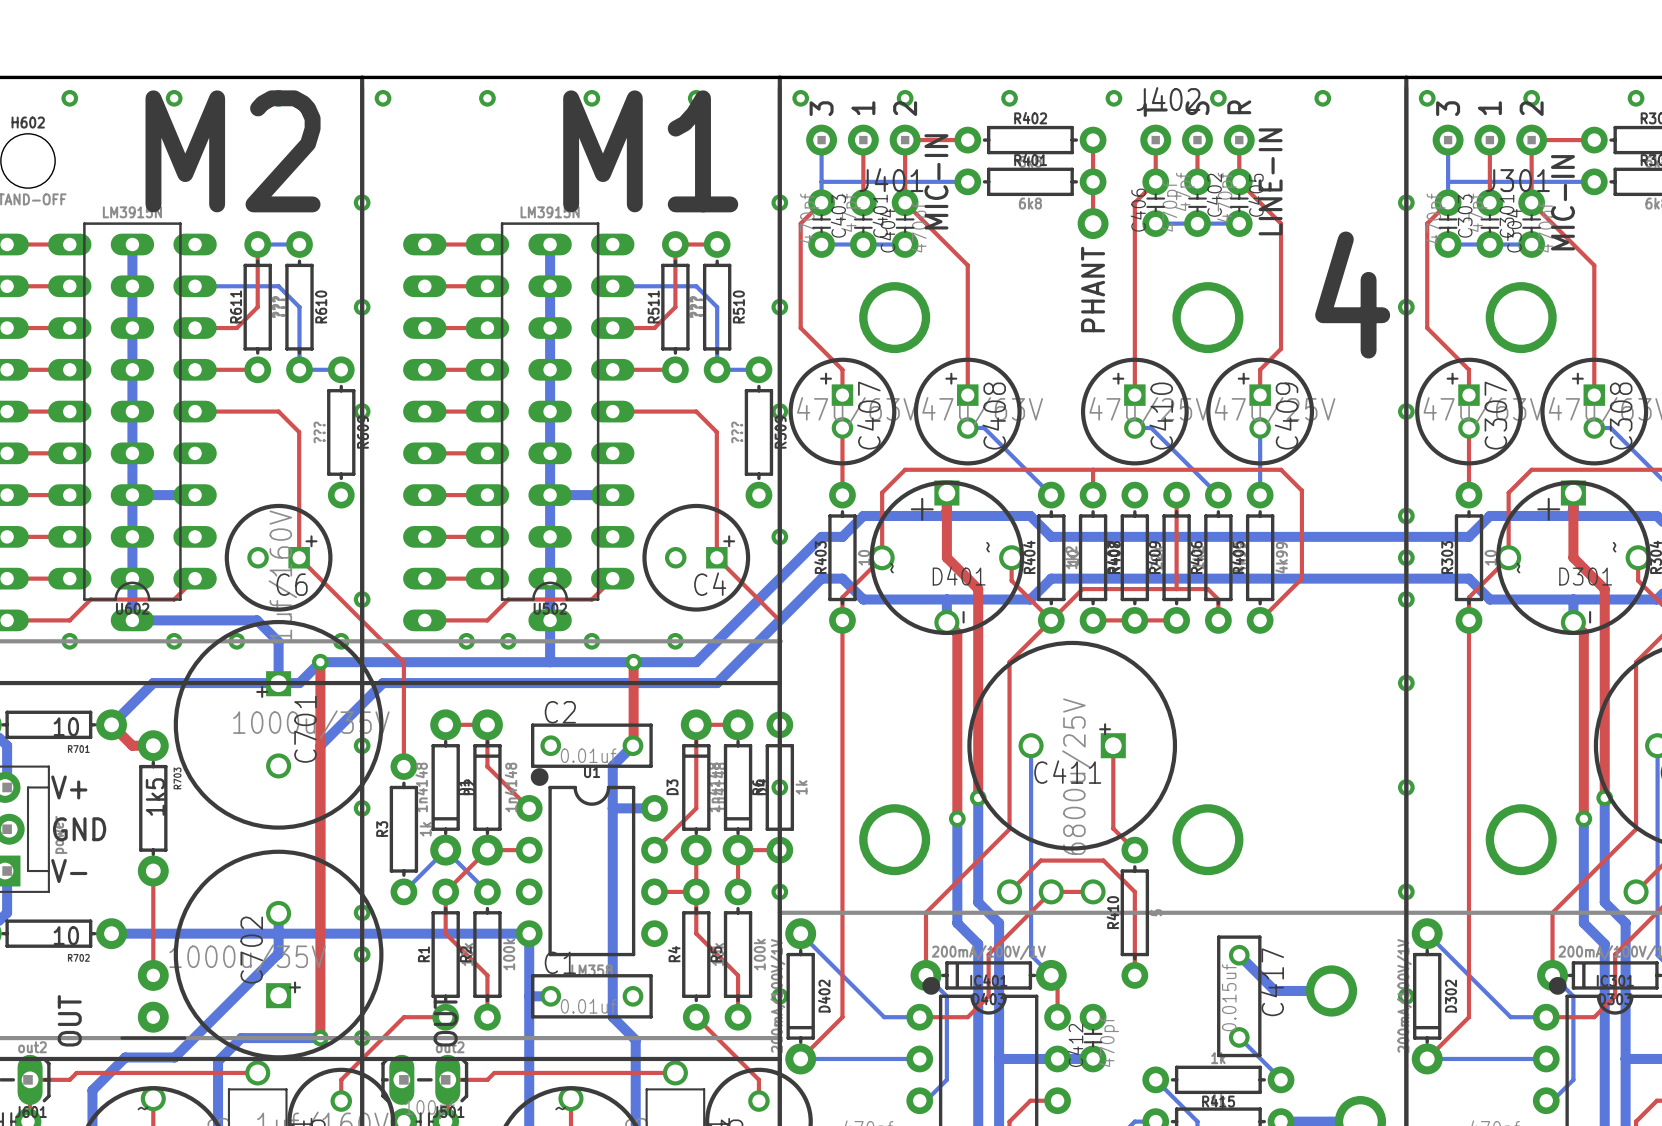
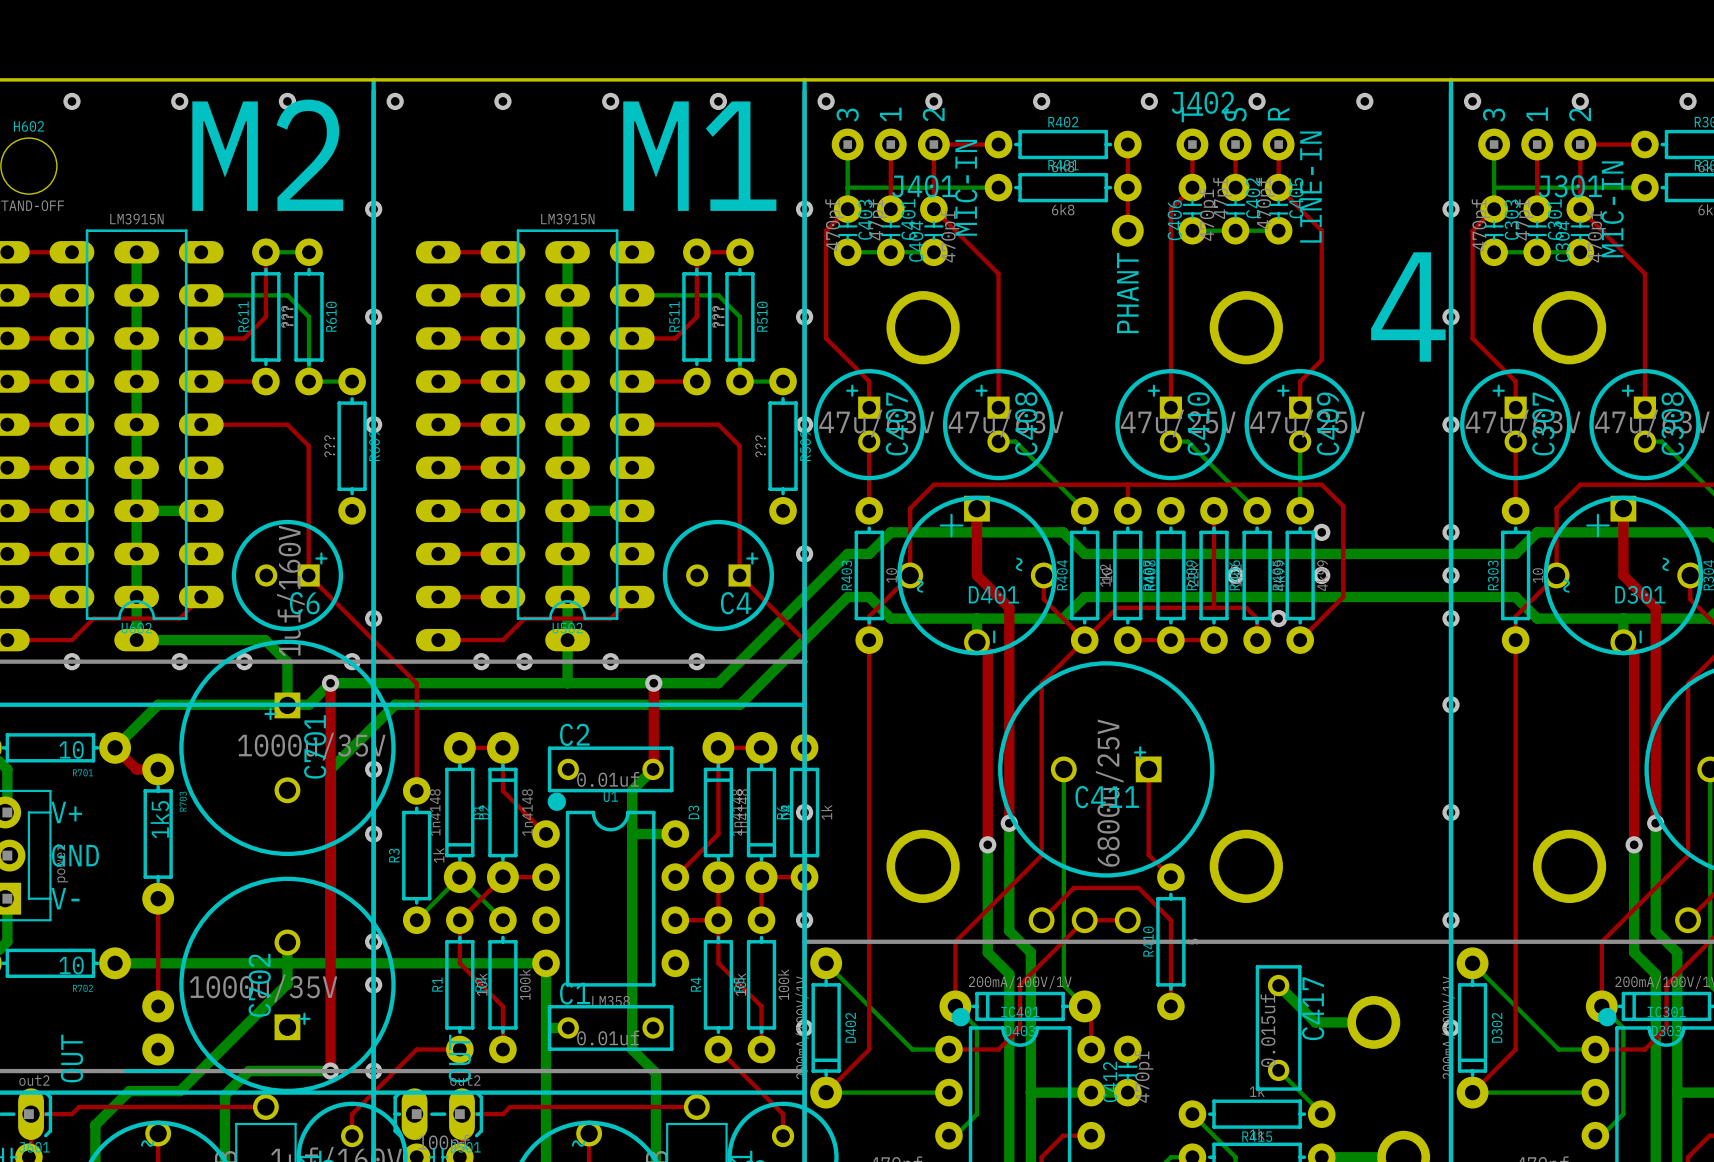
via: none -> (1321, 532)
via: none -> (1235, 575)
via: none -> (1321, 575)
via: none -> (1278, 618)

